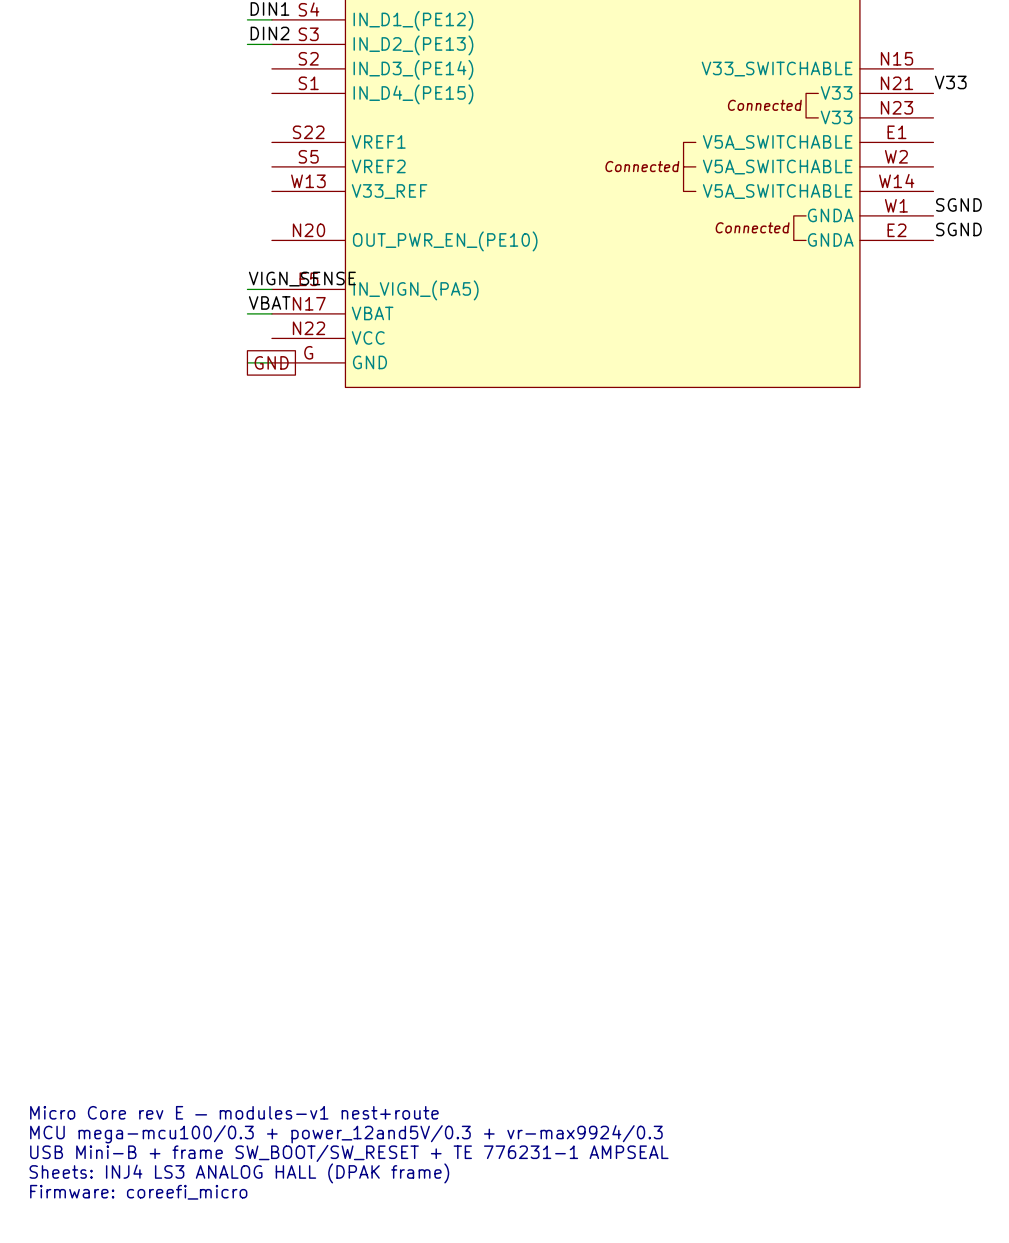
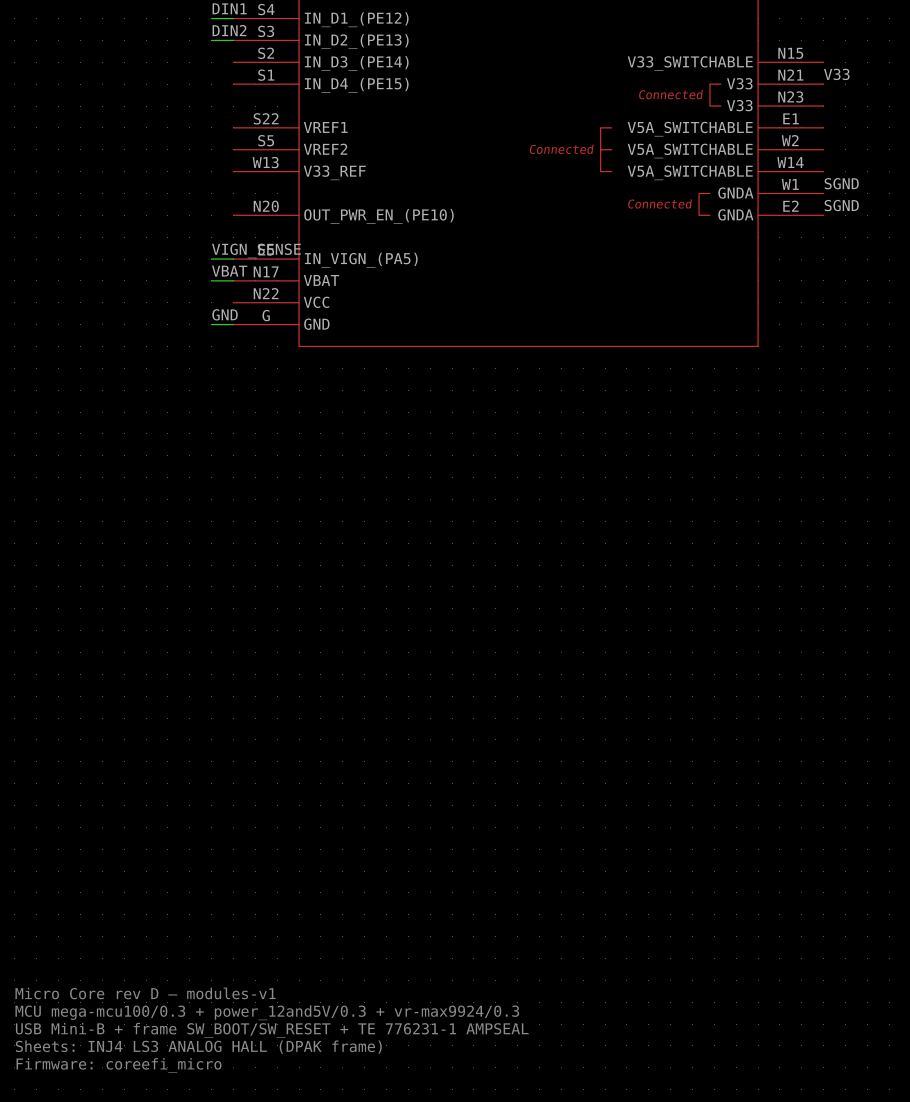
label: none -> GND (225, 314)
global label: GND (271, 362) -> none
text: Micro Core rev E — modules-v1 nest+route (234, 1112) -> Micro Core rev D — modules-v1 (145, 993)

